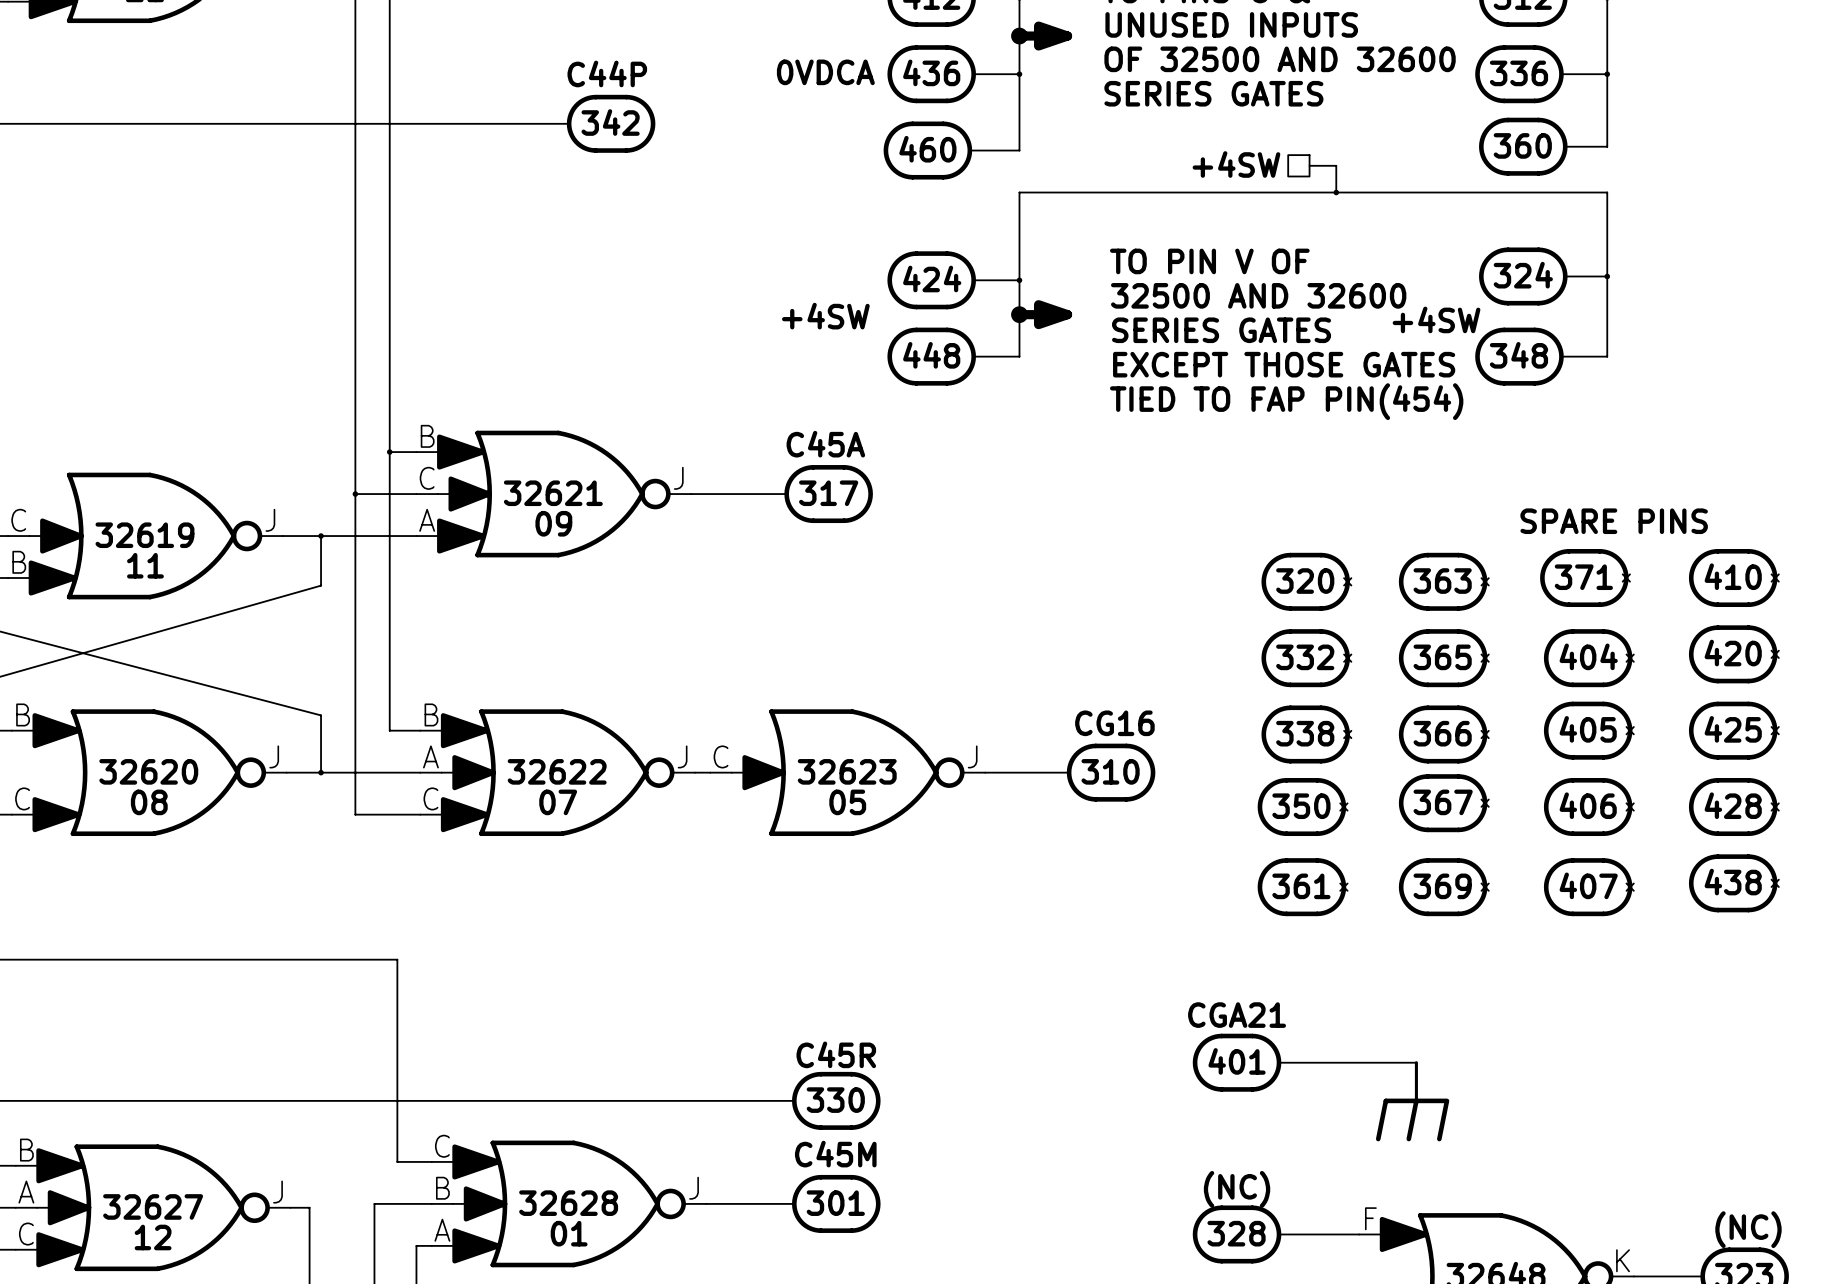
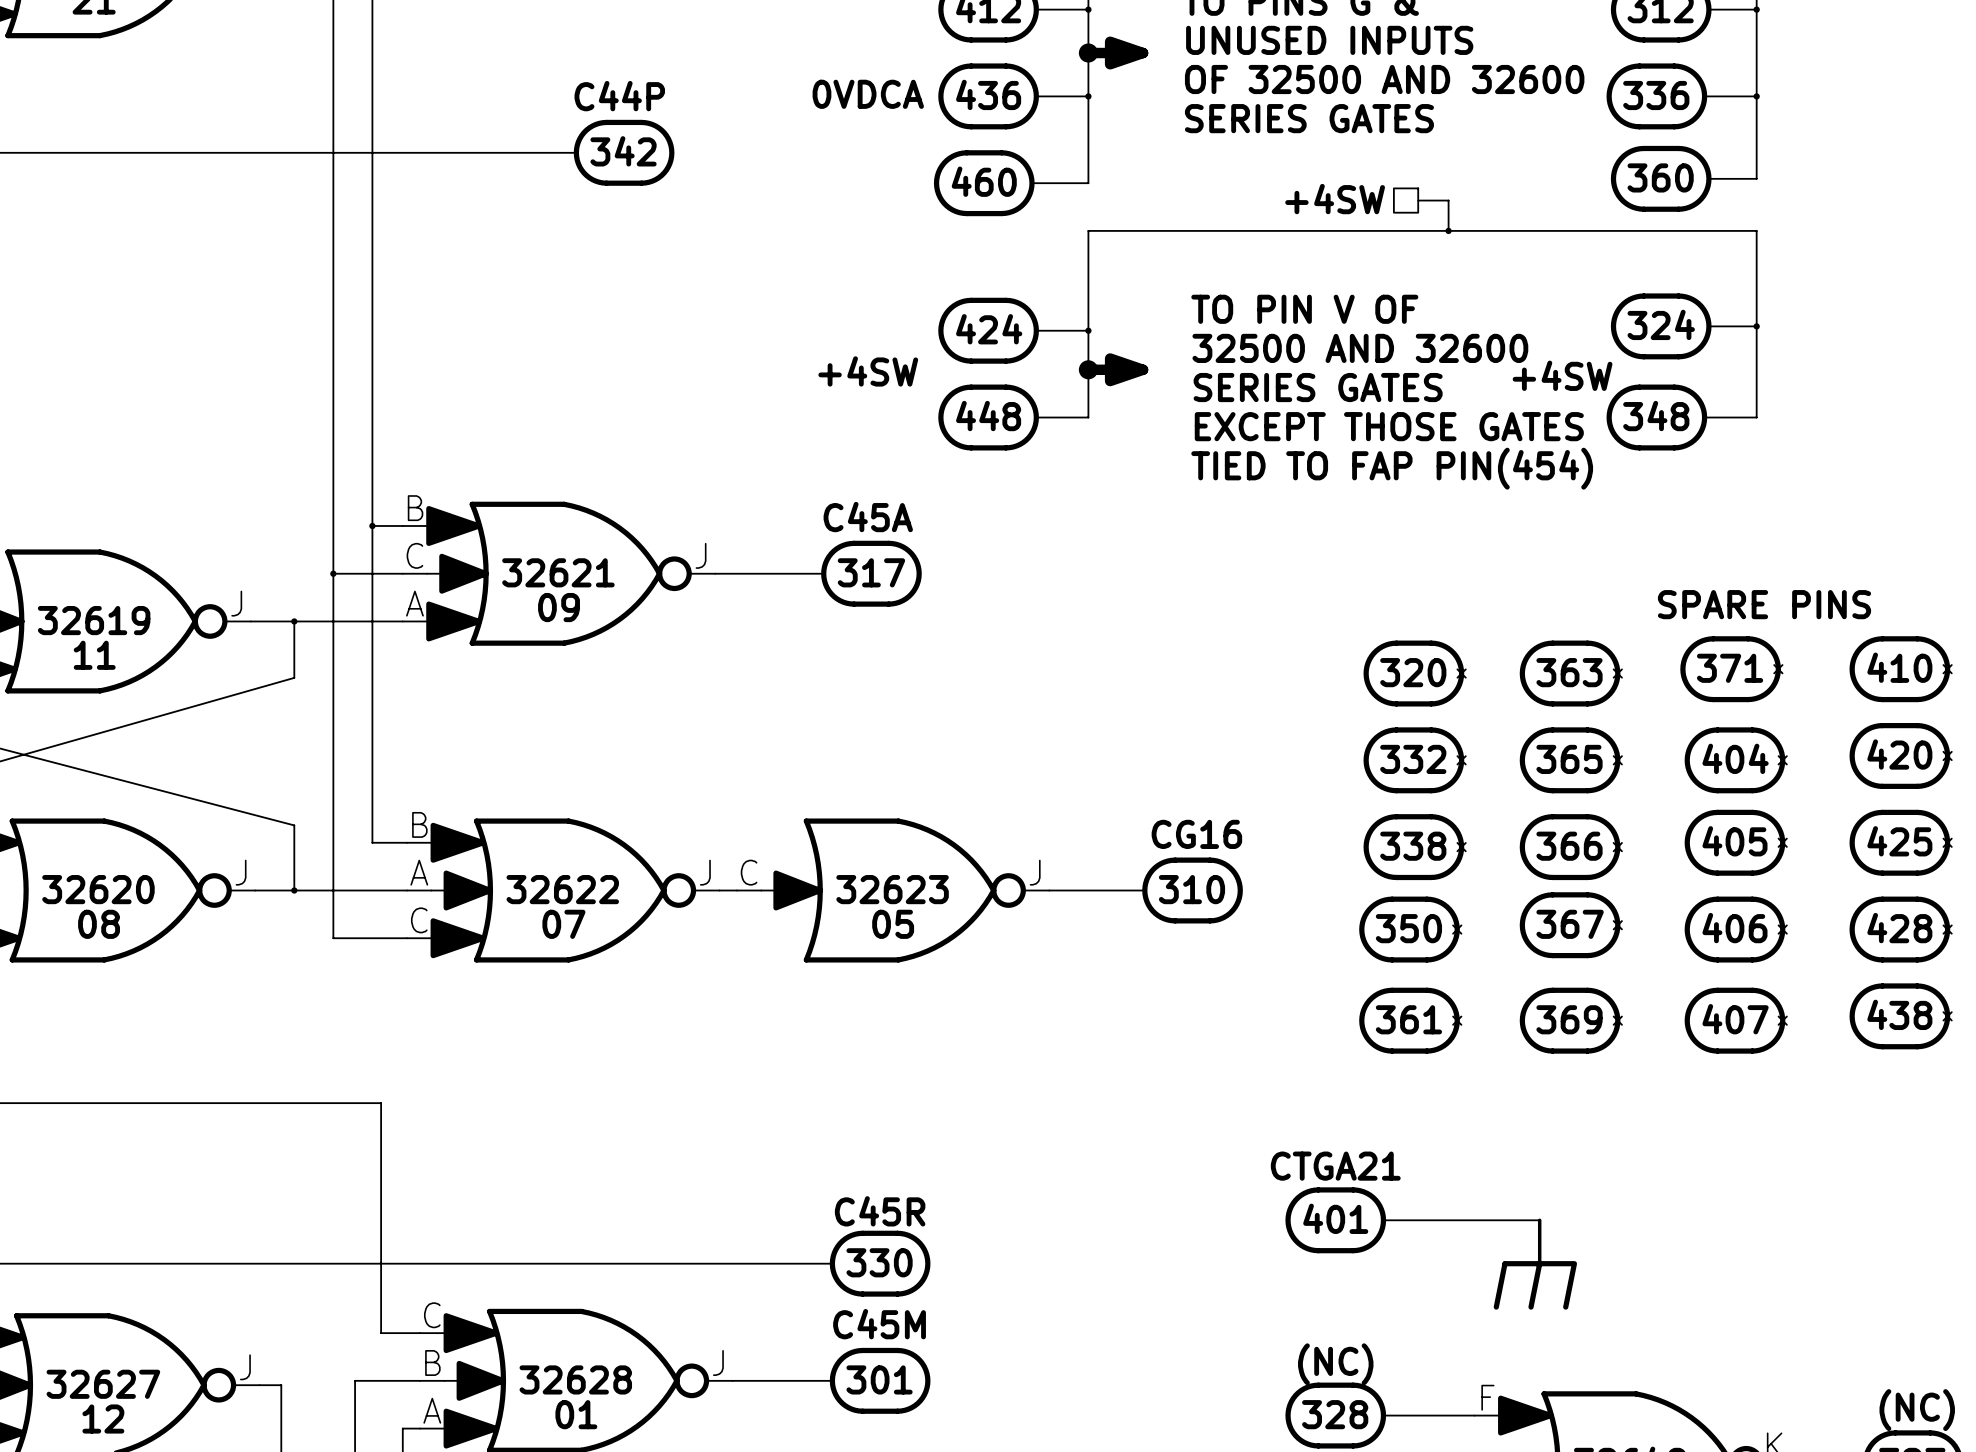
part text: CGA21 (1237, 1015) -> CTGA21 (1335, 1166)

